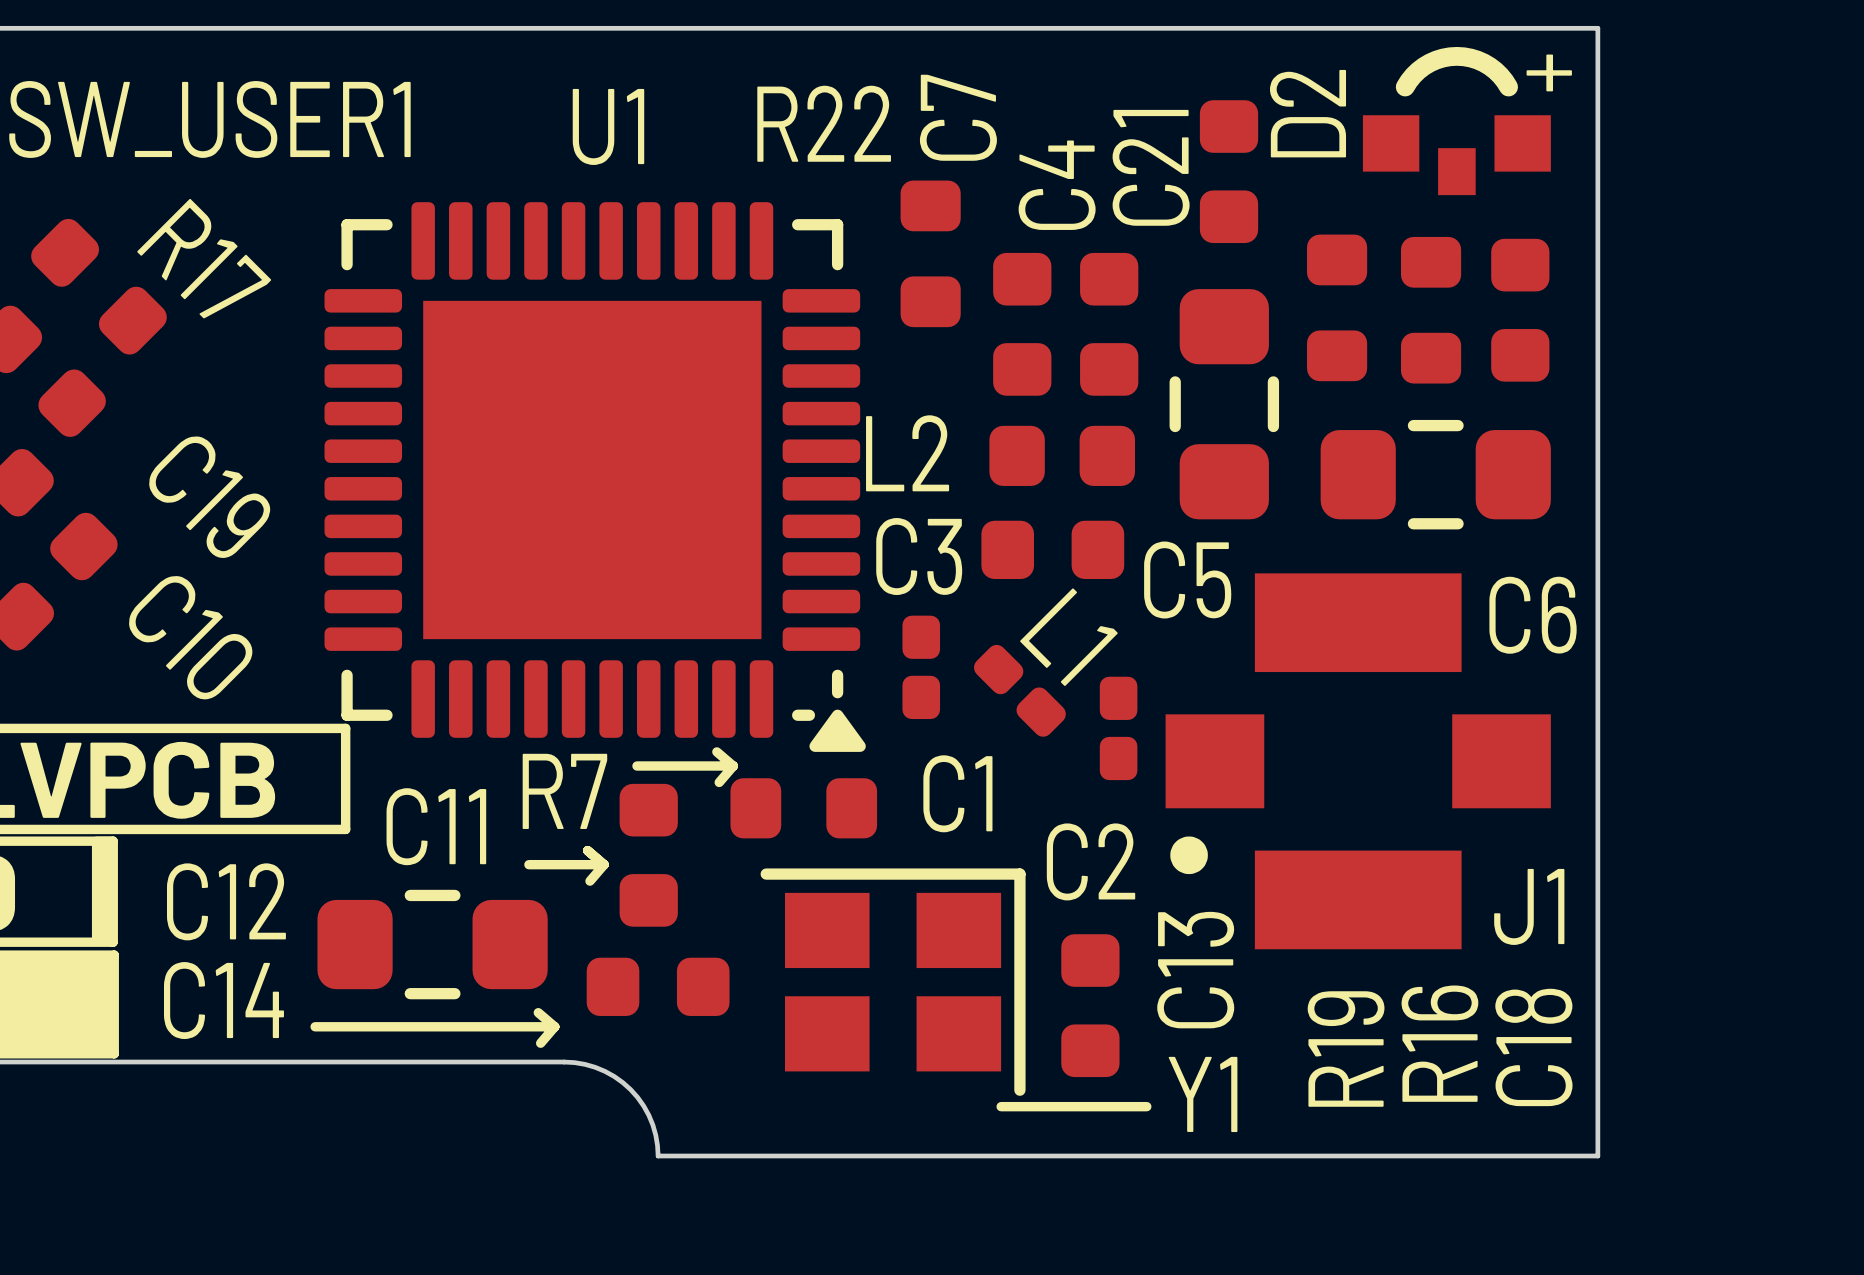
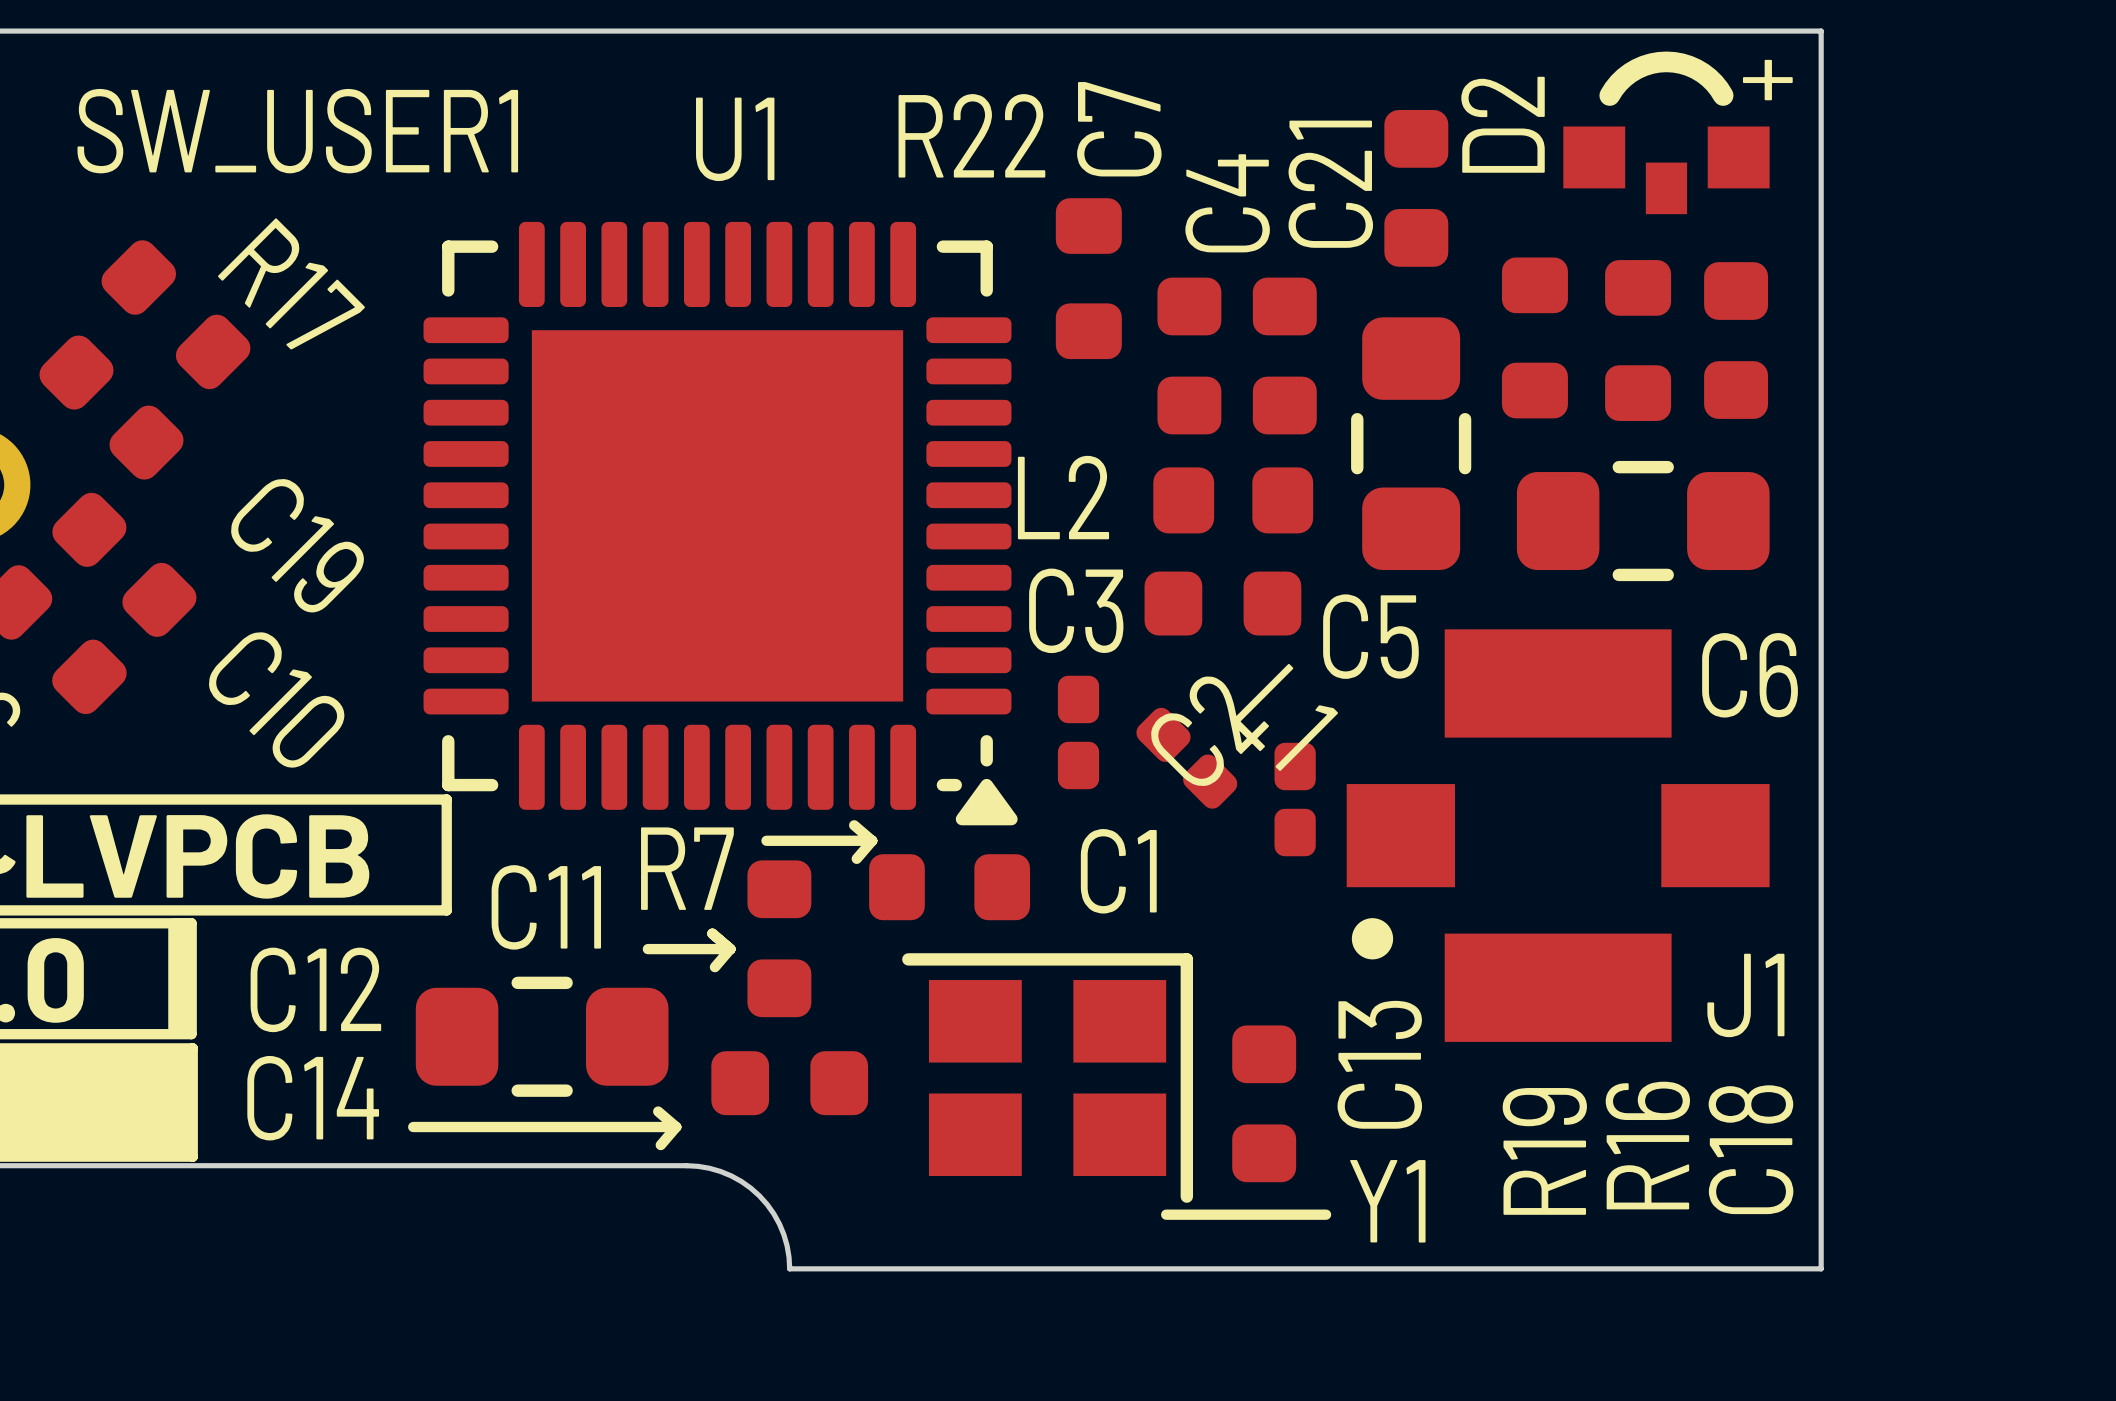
L1 name position: L1 (1068, 637) -> L1 (1284, 717)
C2 name rotation: 0° (1091, 861) -> 45° counterclockwise (1209, 731)
C2 name position: C2 (1091, 861) -> C2 (1209, 731)

